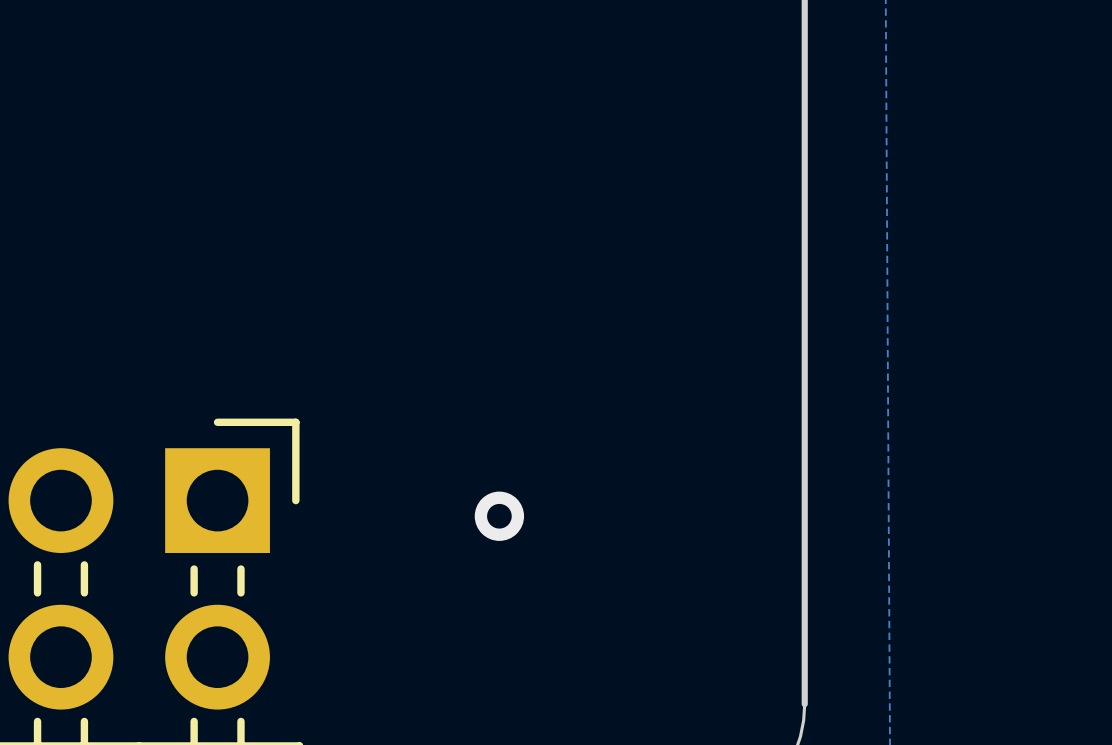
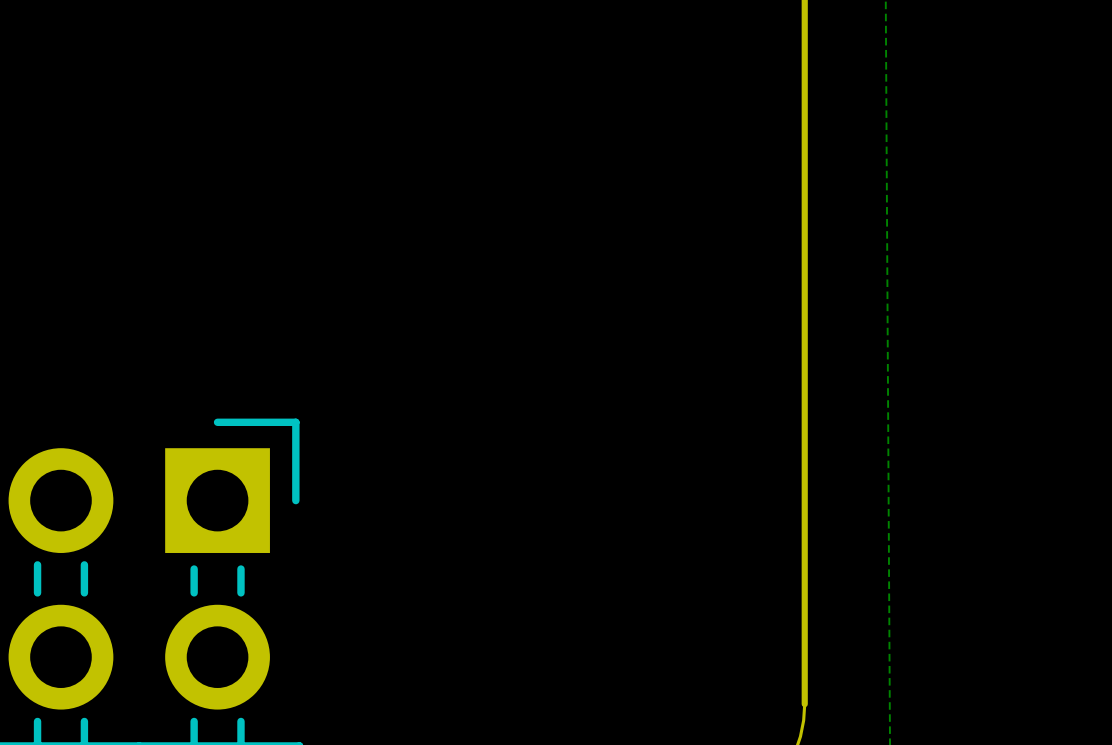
via: (499, 516) -> none

